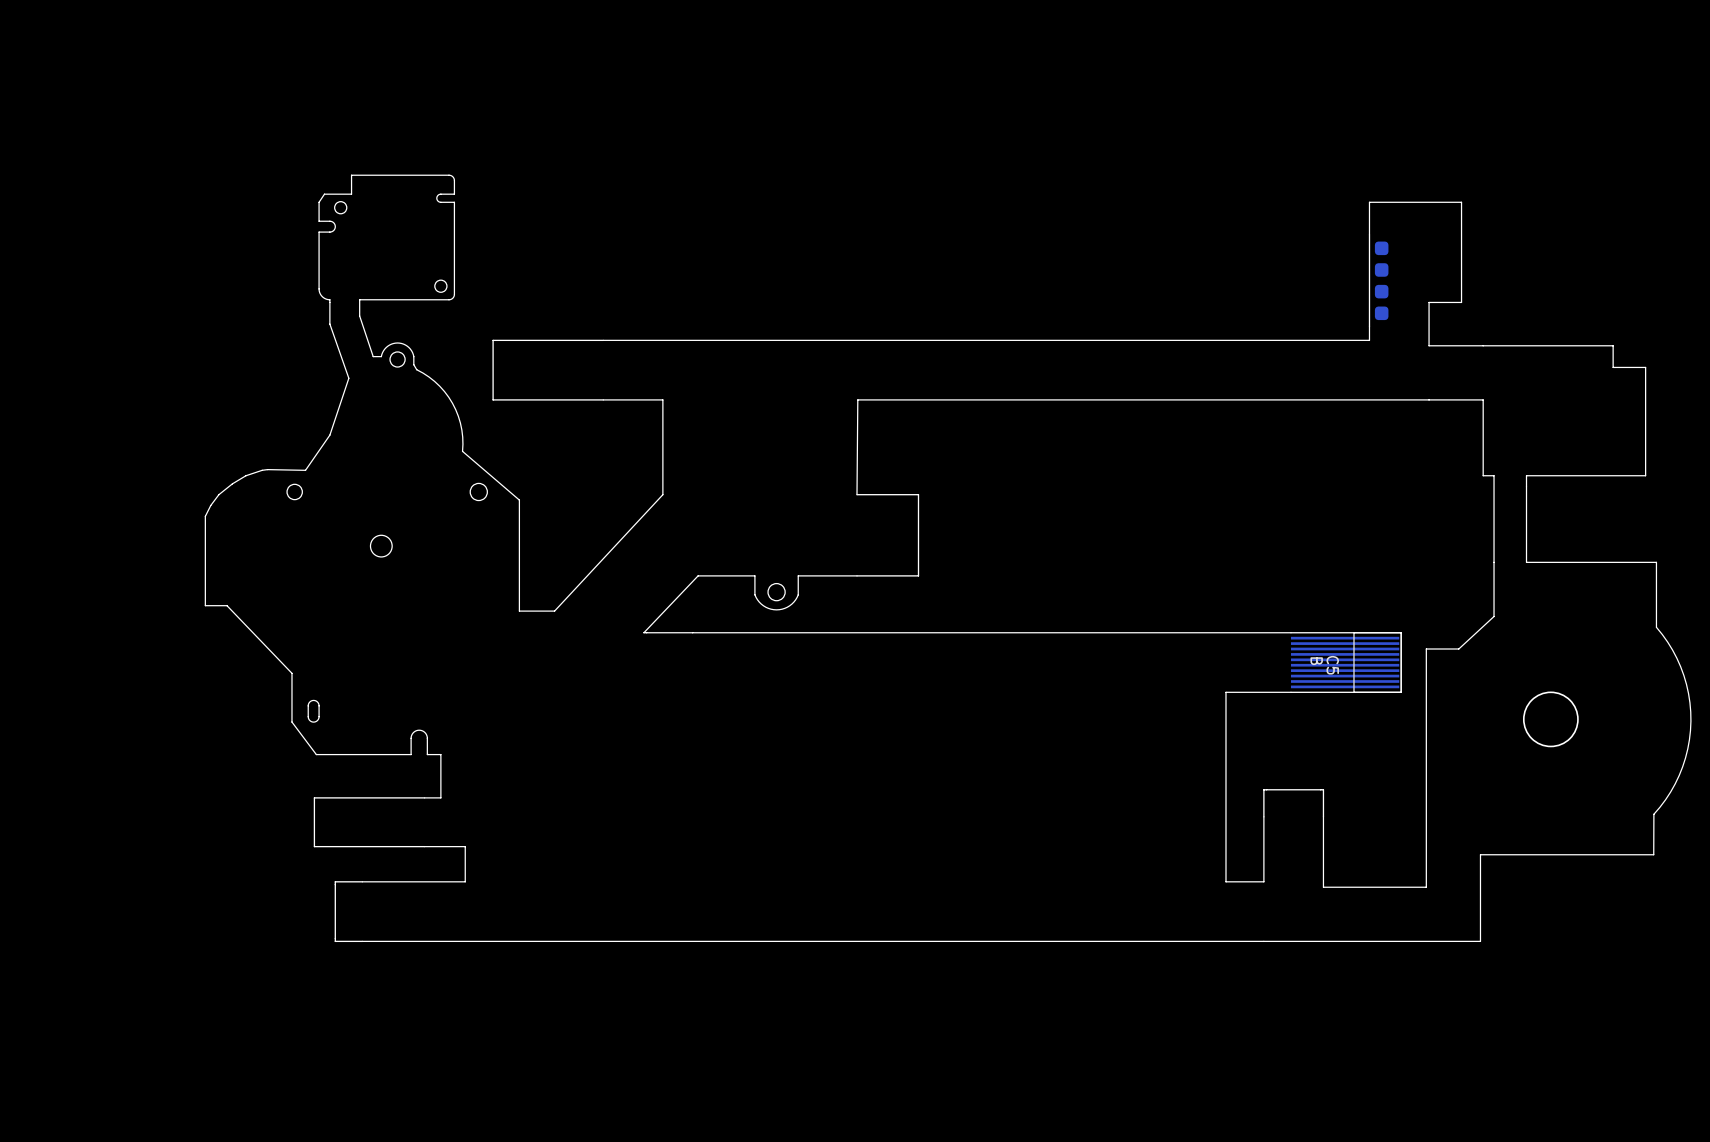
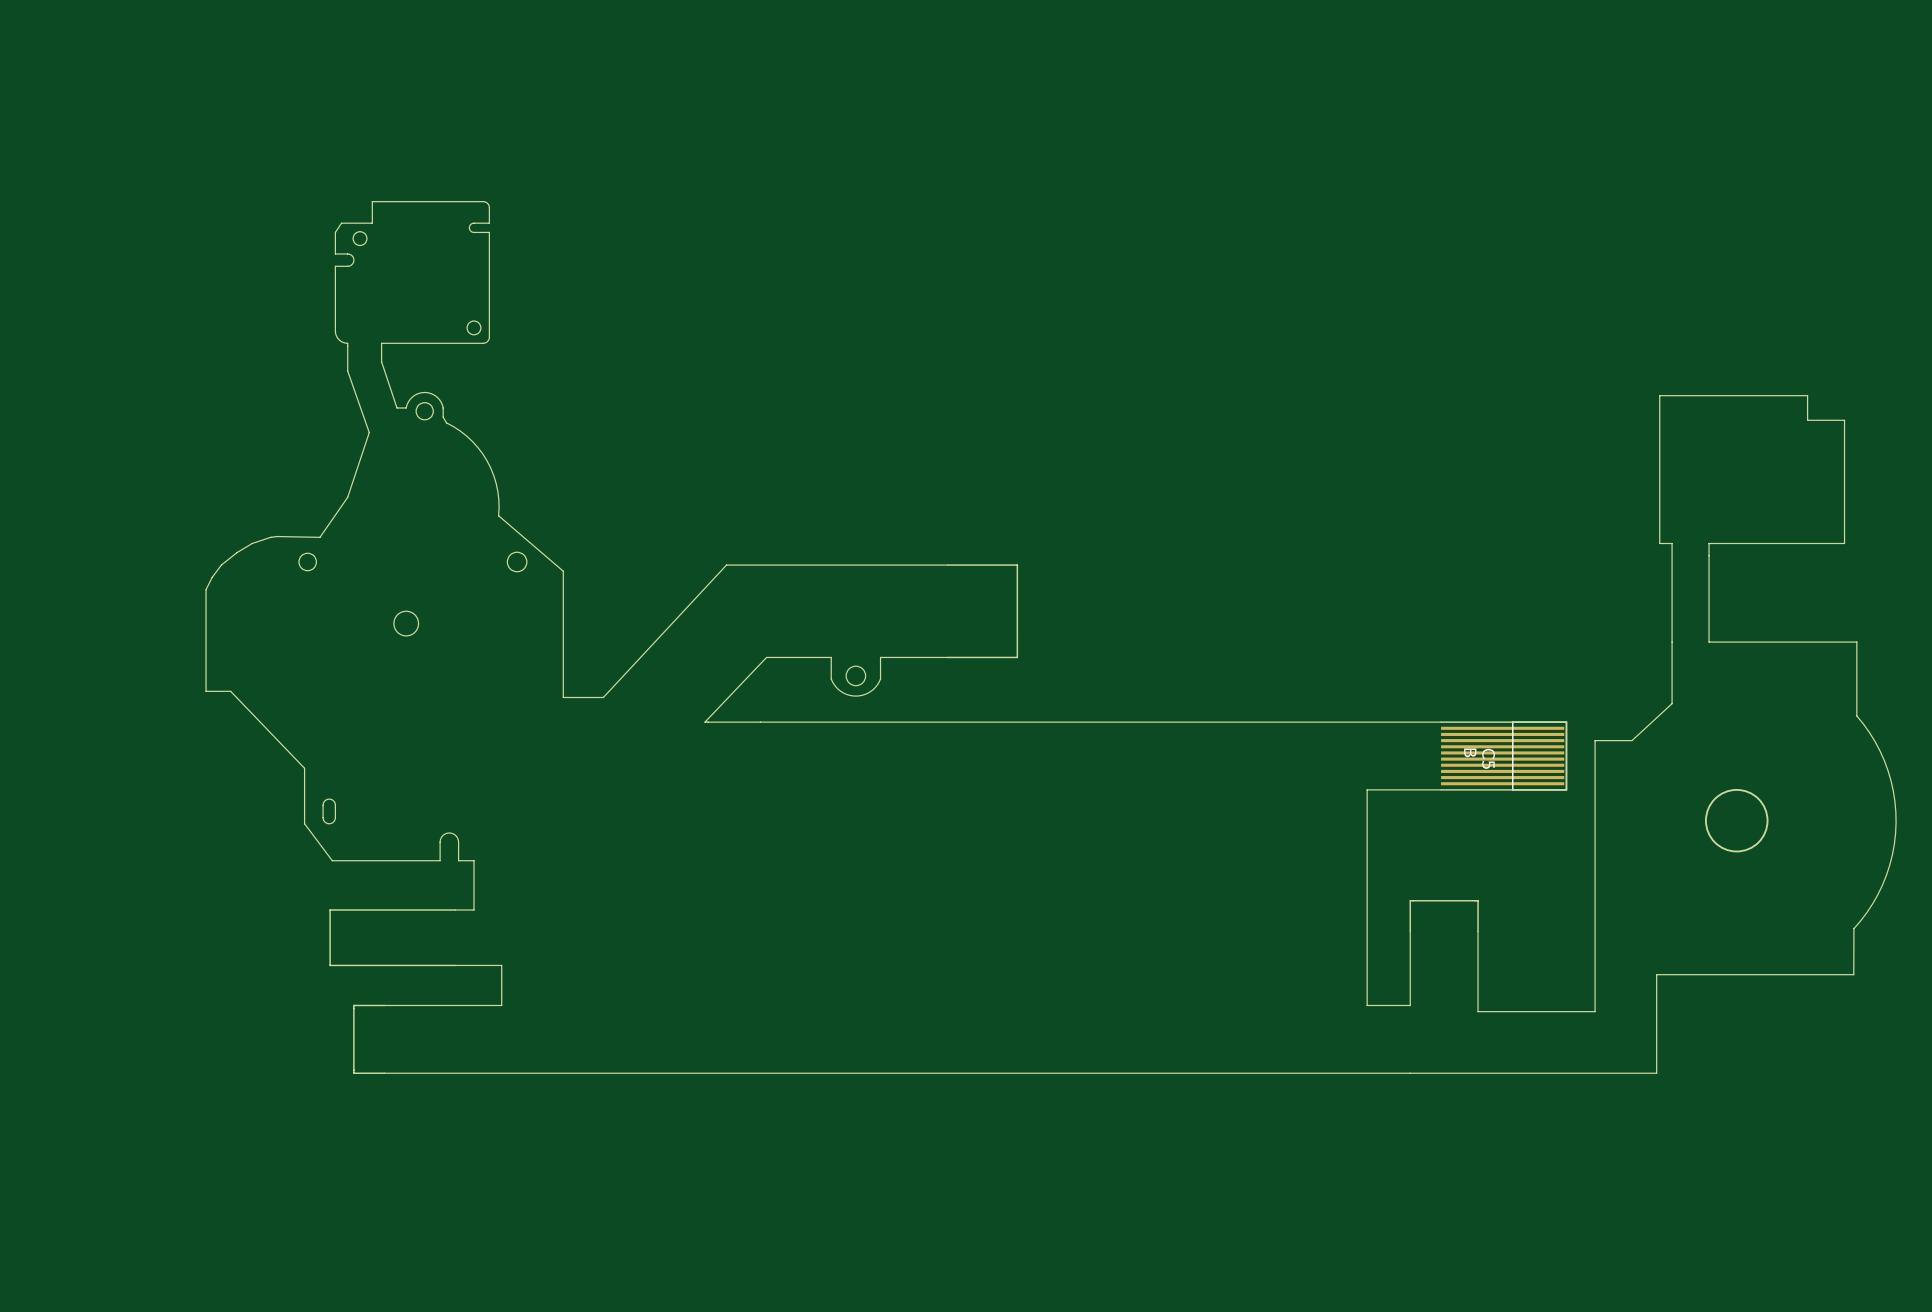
board edge: (1369, 234) (1369, 202) (1461, 202) (1461, 302) (1429, 302) (1429, 345) (1483, 345) -> (1659, 457) (1659, 395)
part: (1378, 280) -> none
board edge: (1369, 326) (1369, 340) (603, 340) -> none
part: (548, 370) -> none
board edge: (603, 399) (662, 399) (662, 494) -> (947, 565) (726, 565)
board edge: (1483, 399) (857, 399) (856, 494) -> none

